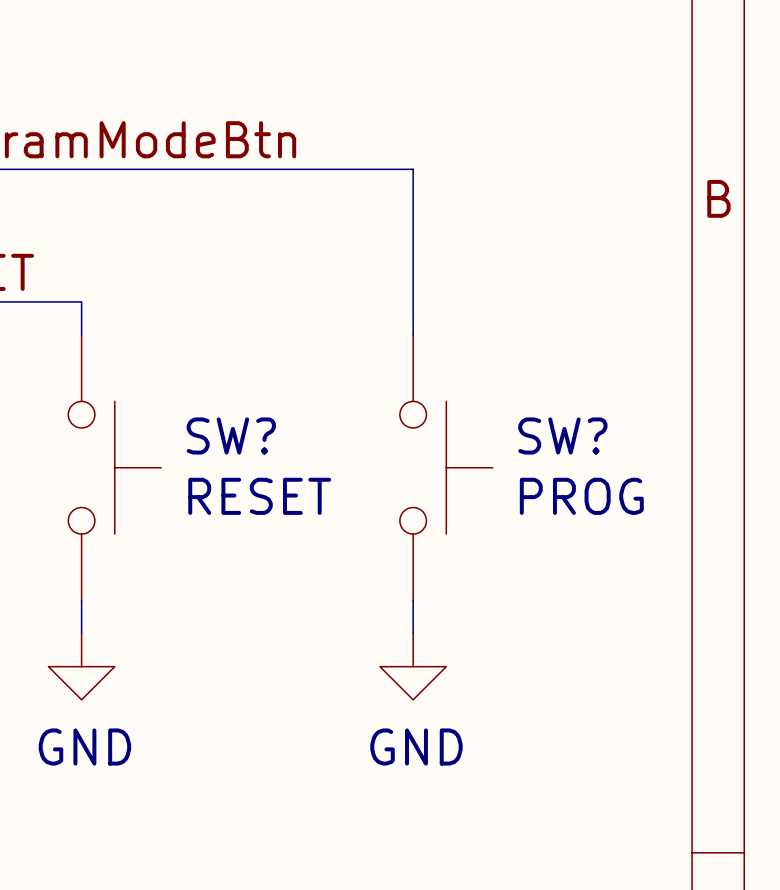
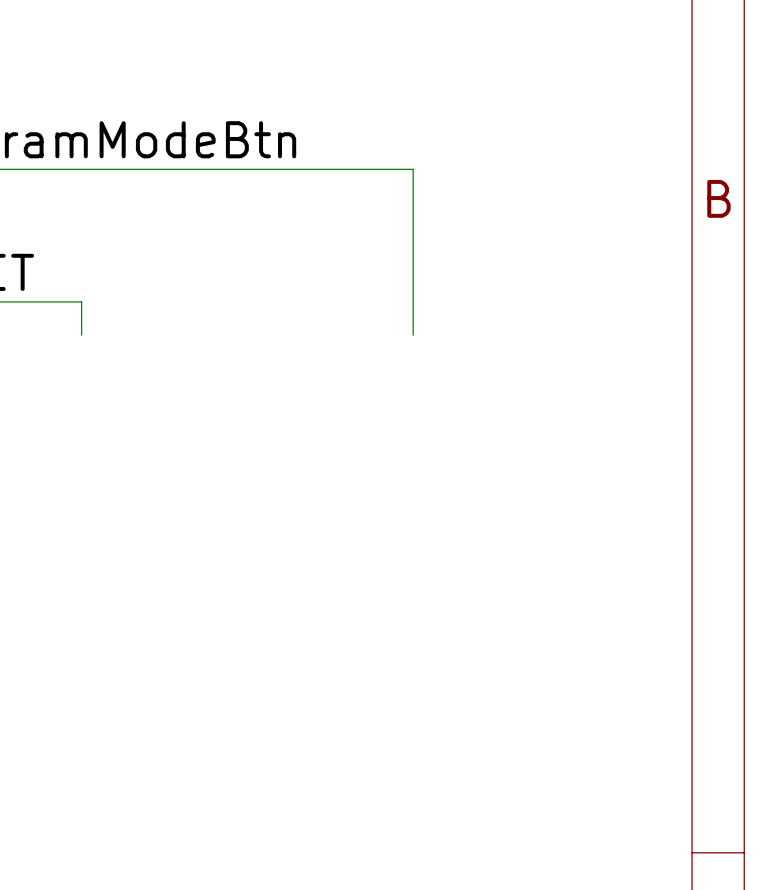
SW?: RESET (114, 467) -> none
SW?: PROG (446, 467) -> none
wire: (81, 600) (81, 633) -> none
wire: (413, 600) (413, 633) -> none
power symbol: GND (81, 666) -> none
power symbol: GND (413, 666) -> none

